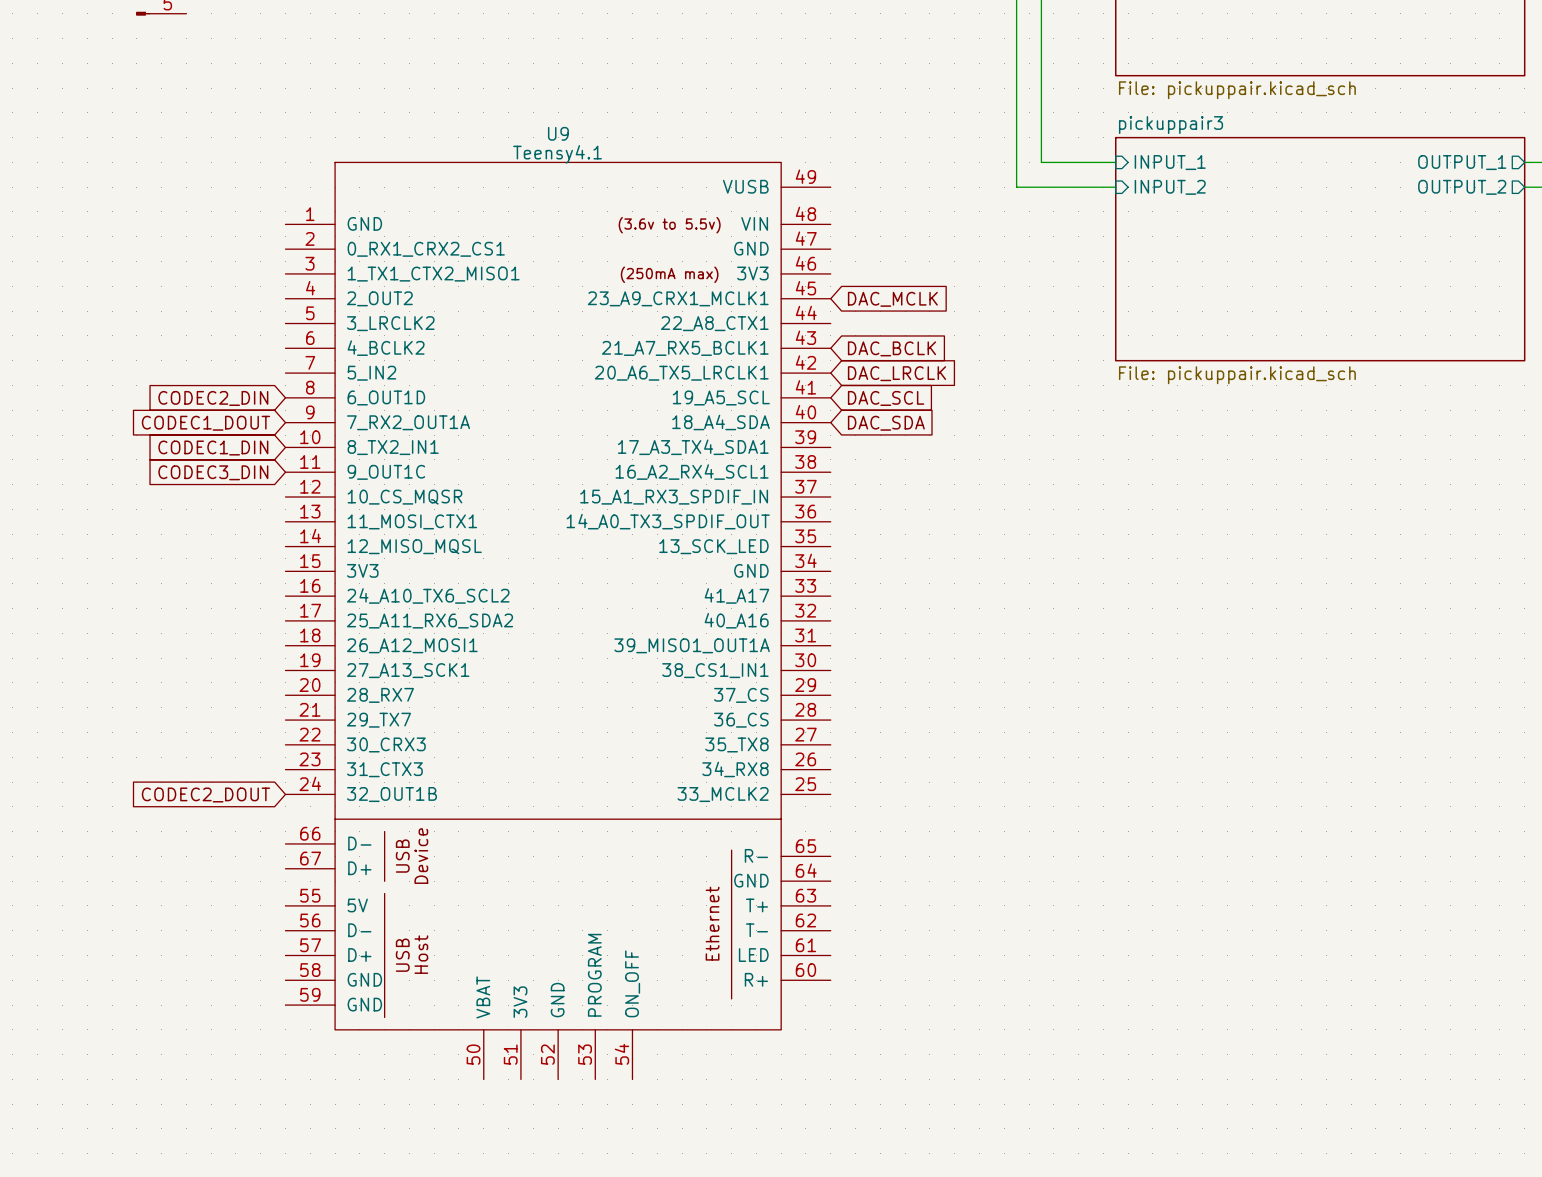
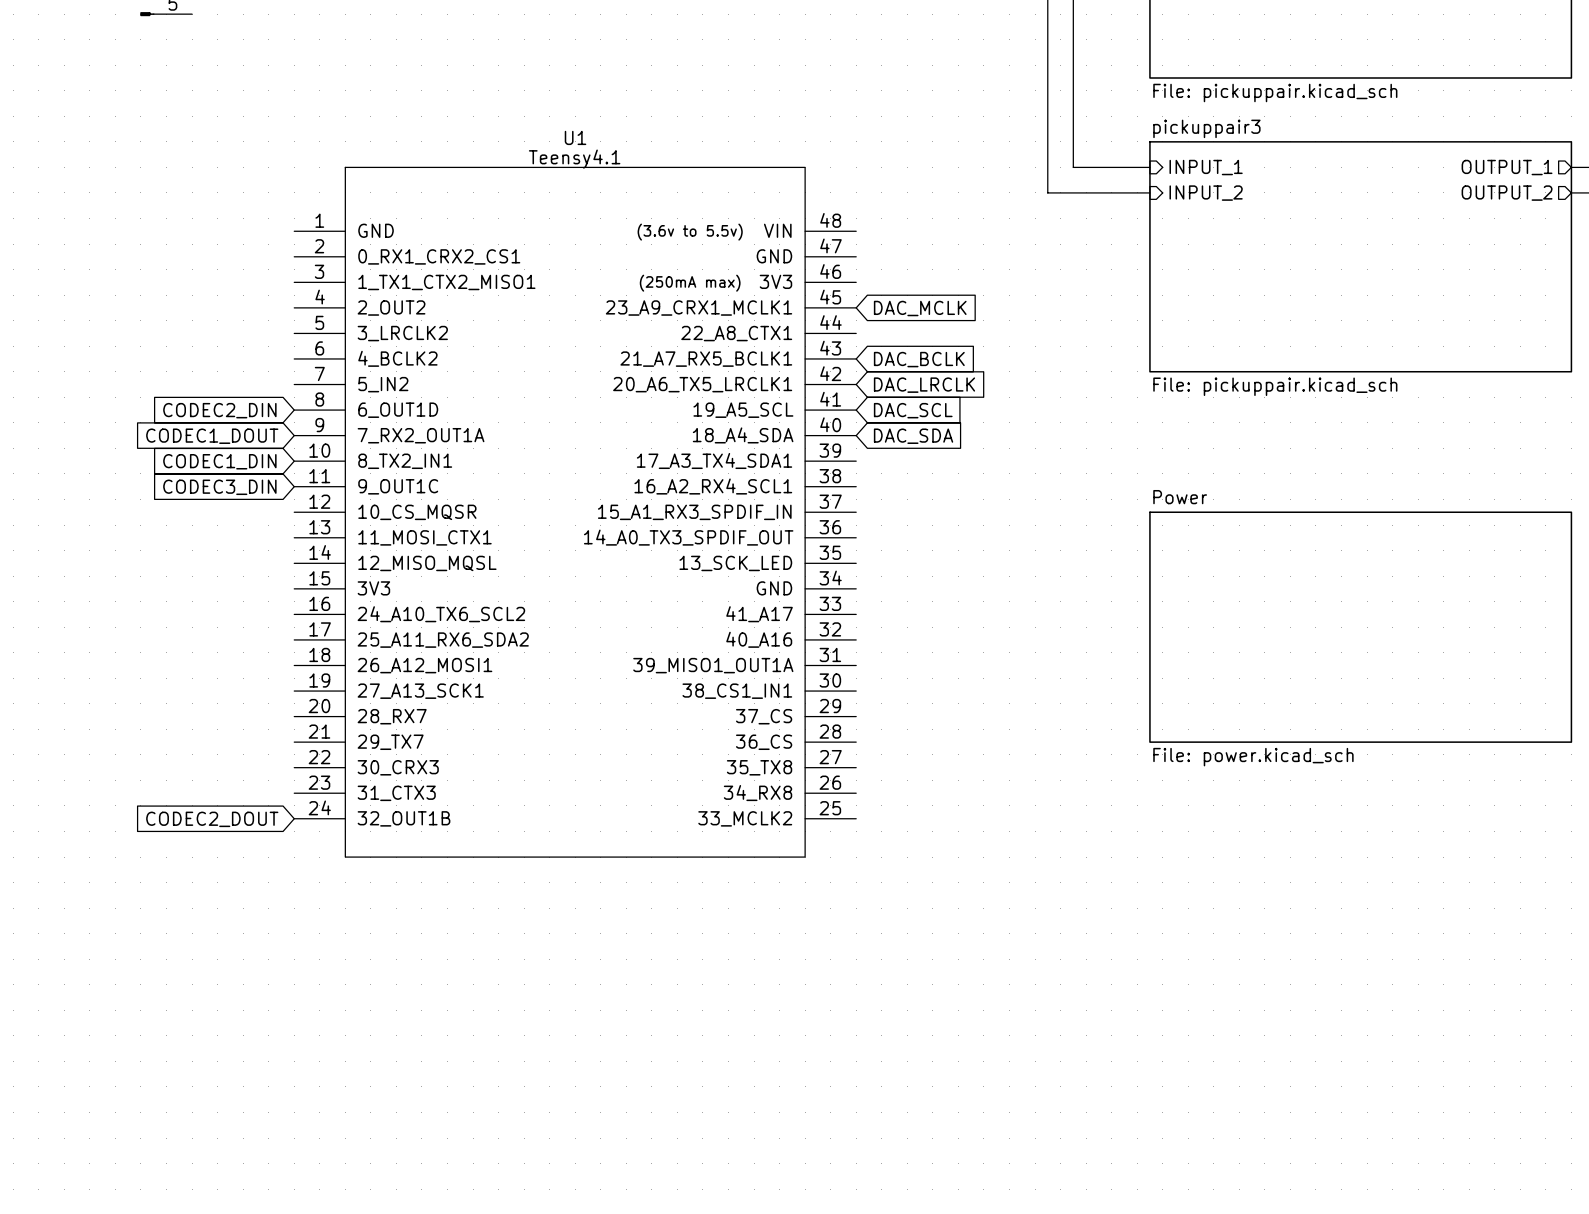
U1: none -> Teensy4.1 (575, 512)
sheet Power: none -> File: power.kicad_sch (1360, 627)
U9: Teensy4.1 (558, 620) -> none

